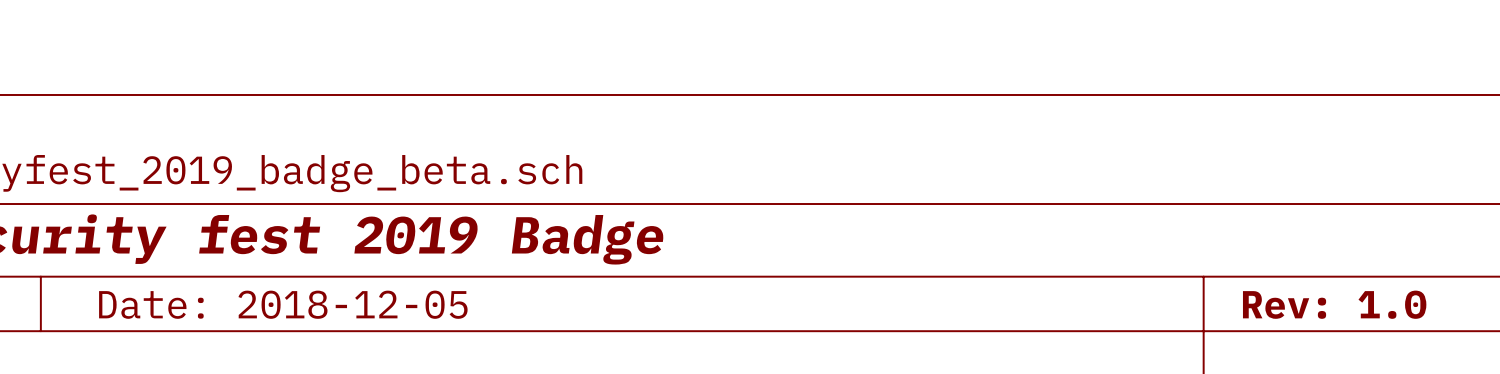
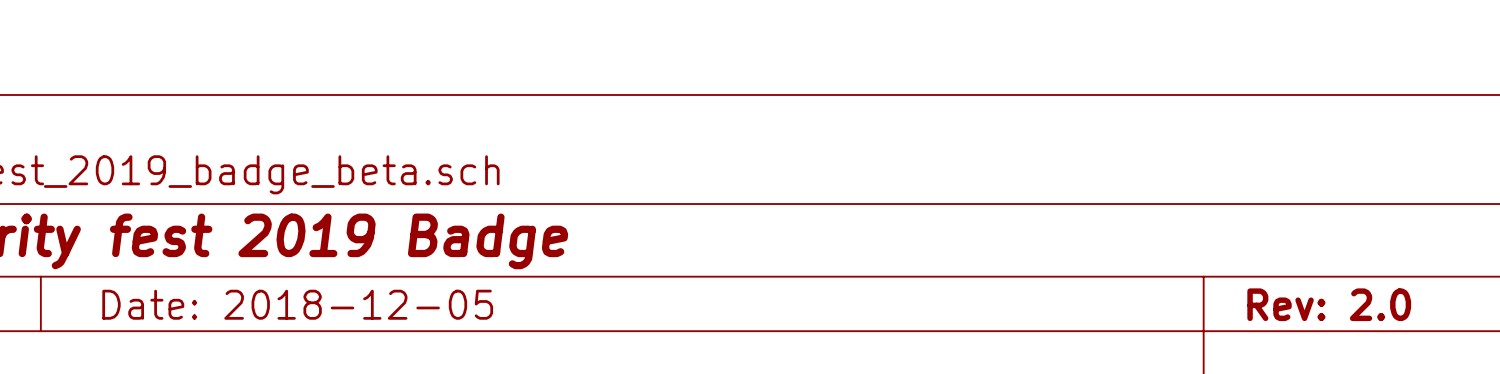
title block: Rev: 1.0 (1334, 304) -> Rev: 2.0 (1329, 304)

